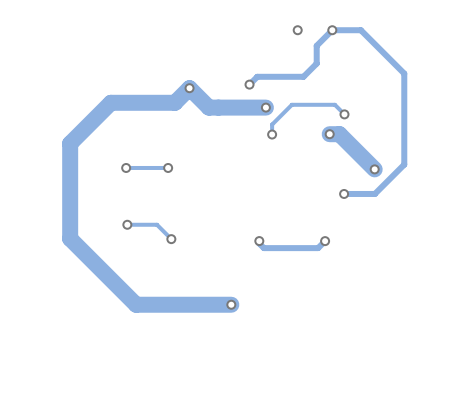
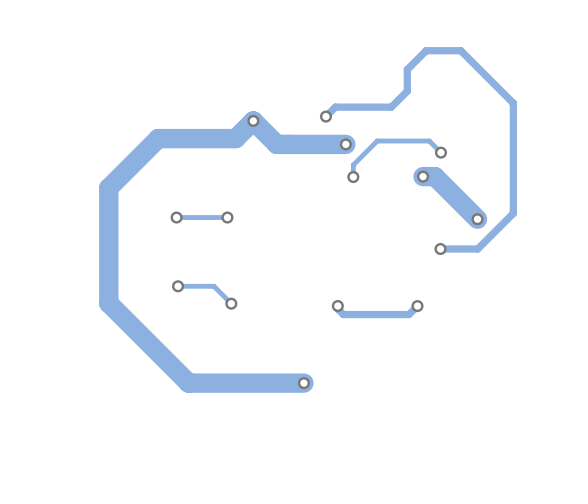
via: (297, 30) -> none
via: (332, 30) -> none

